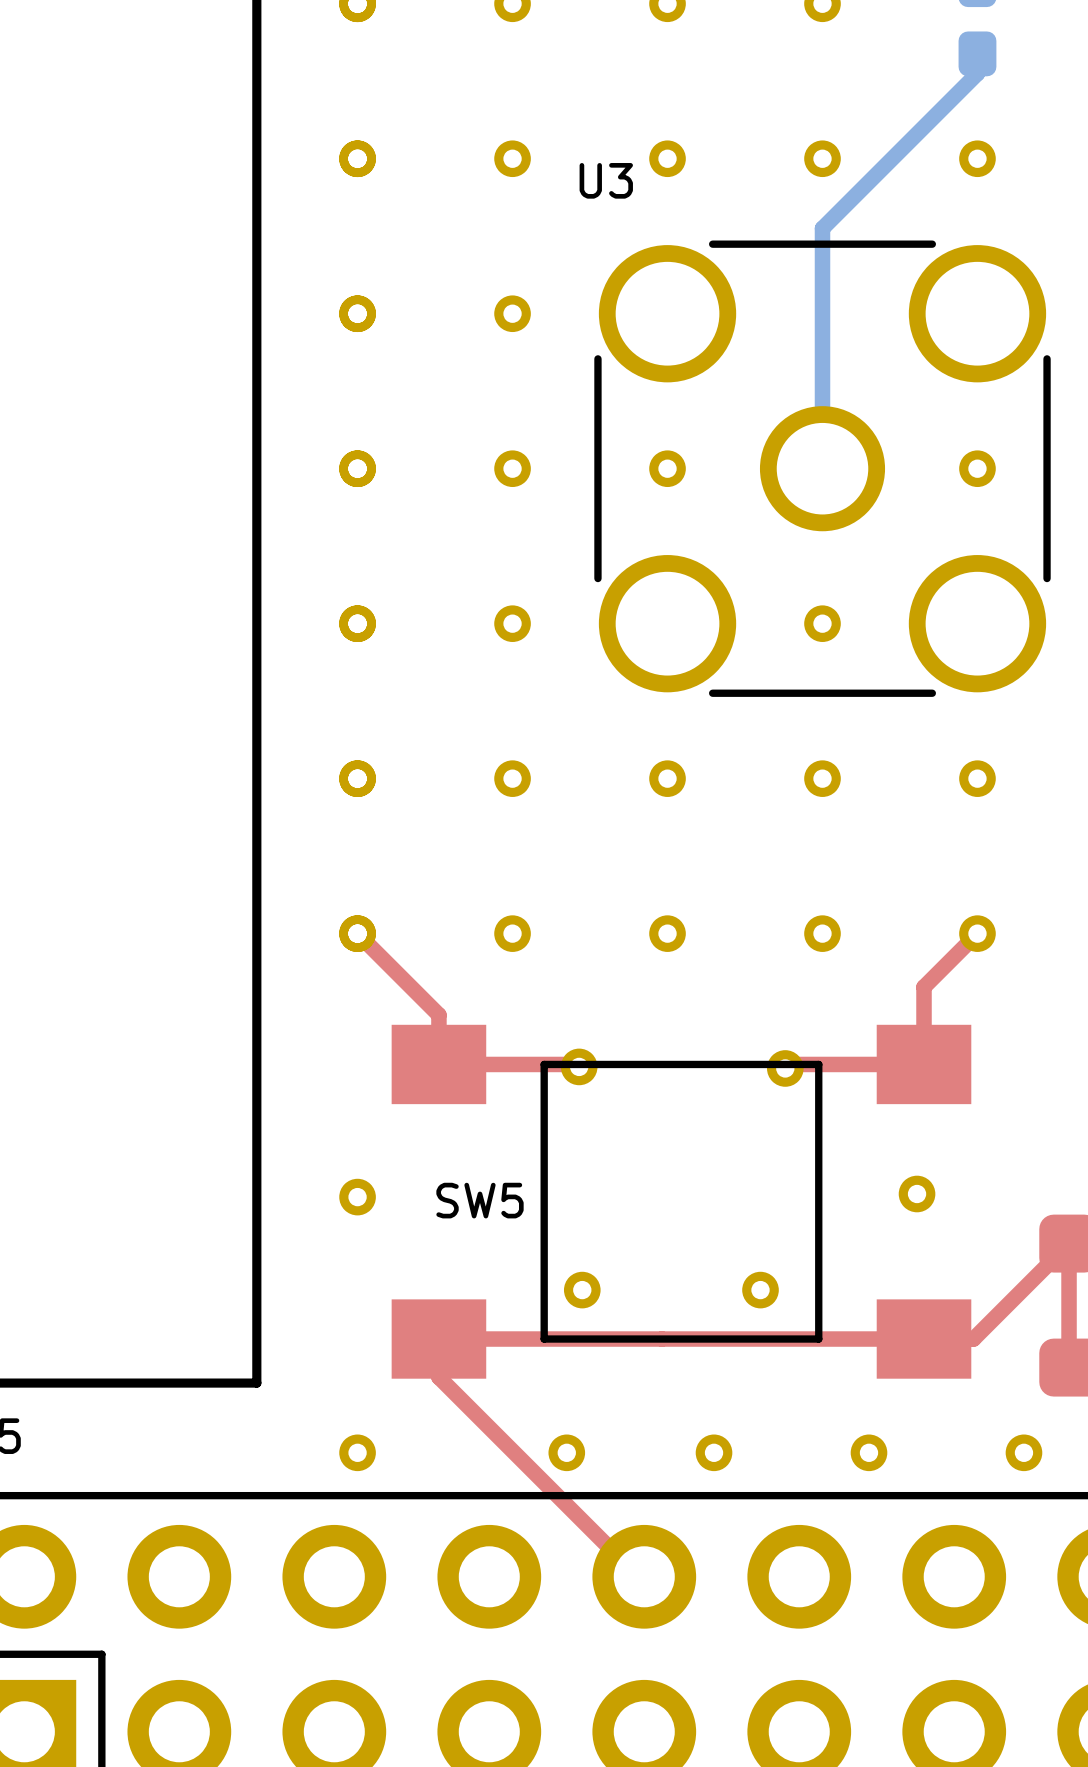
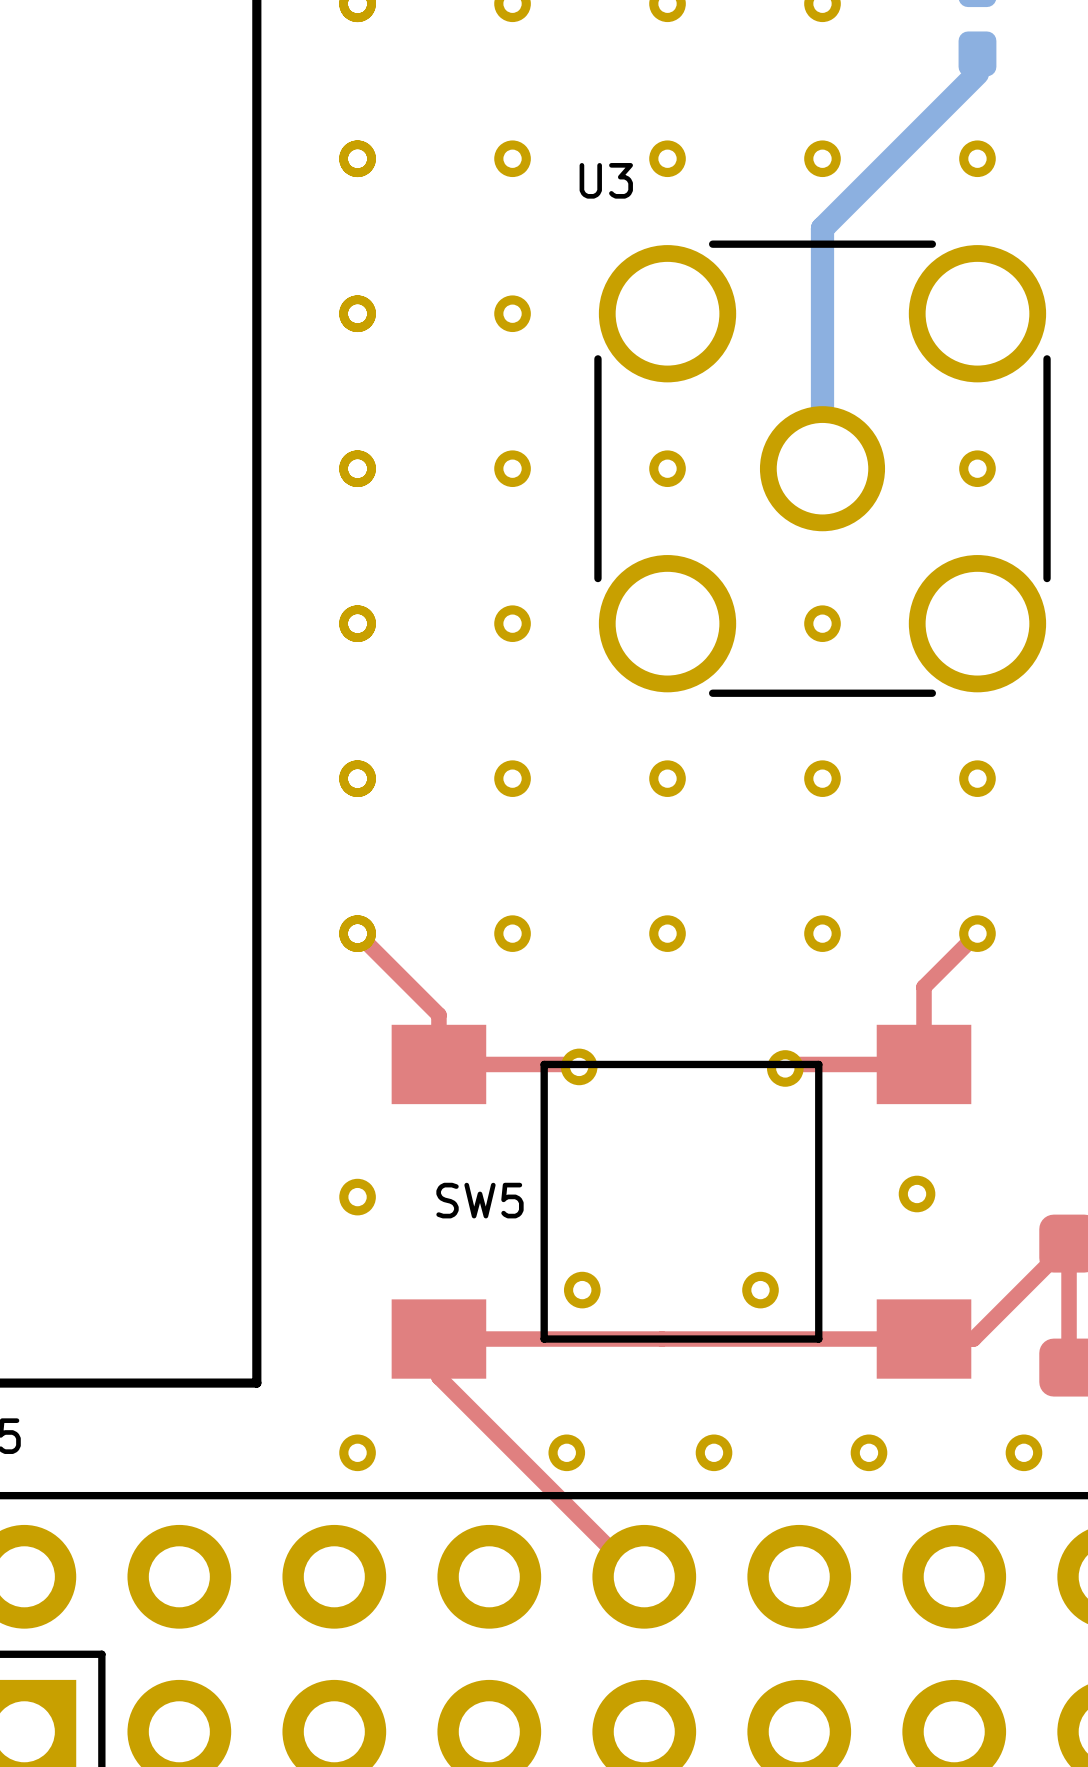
bottom track width: thin (977, 73) (822, 228) (822, 460) -> thick (977, 73) (822, 228) (822, 460)

